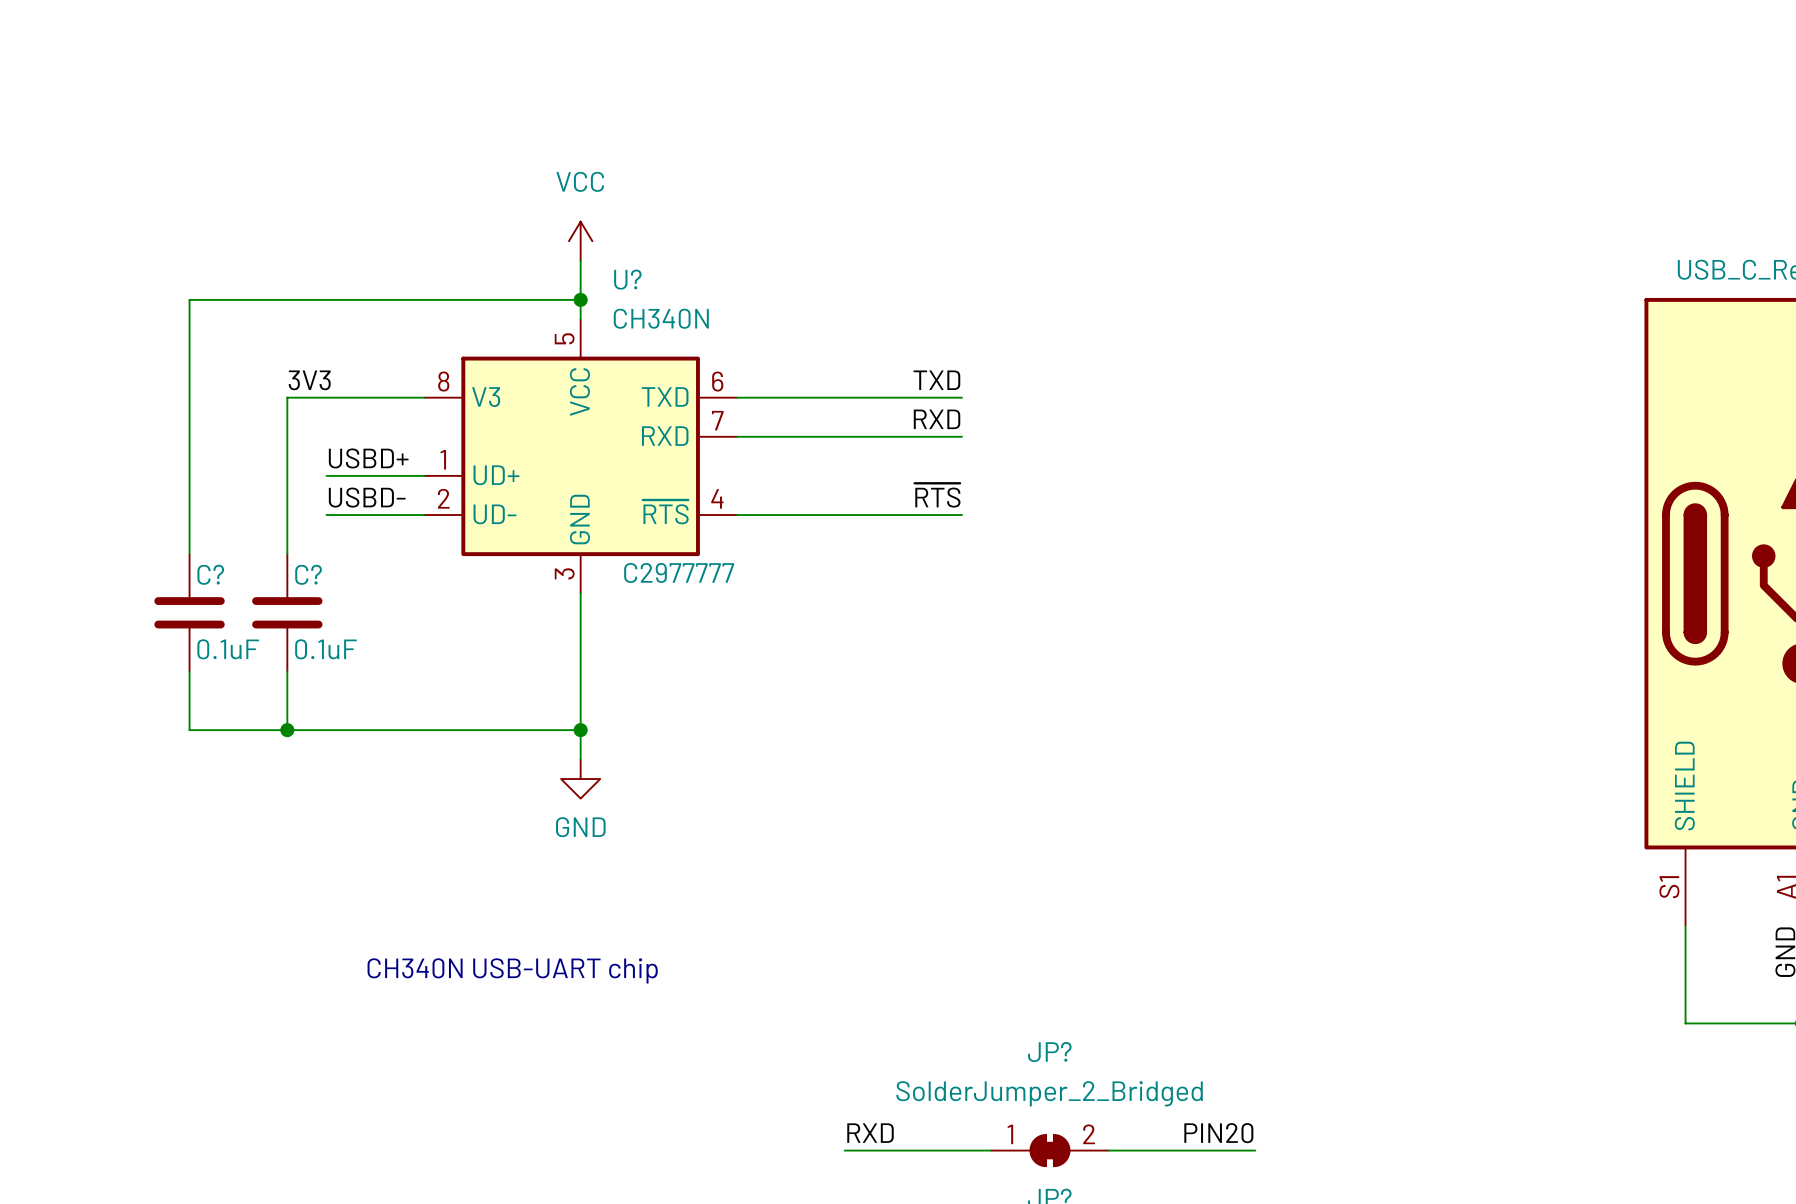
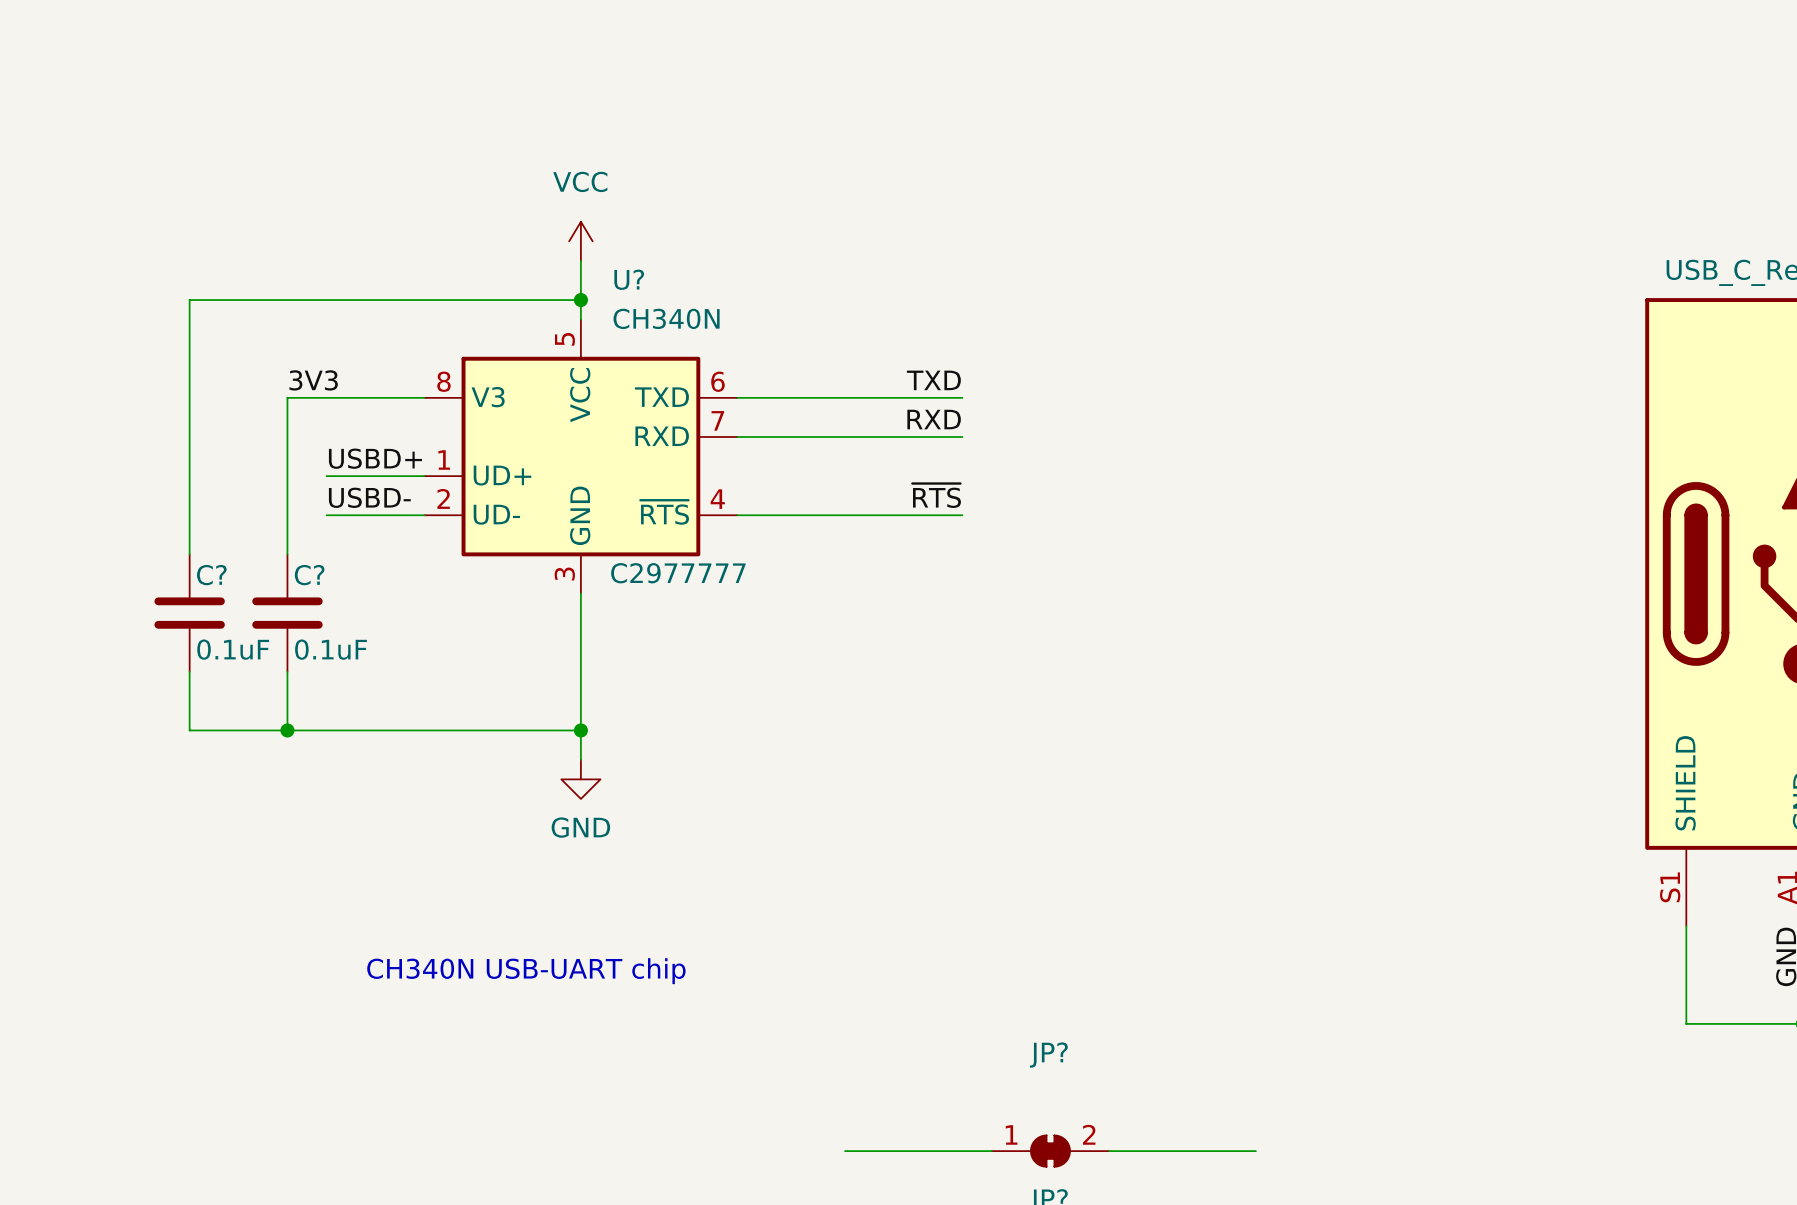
JP? value: SolderJumper_2_Bridged (1049, 1093) -> none
label: RXD (870, 1133) -> none
label: PIN20 (1218, 1133) -> none

